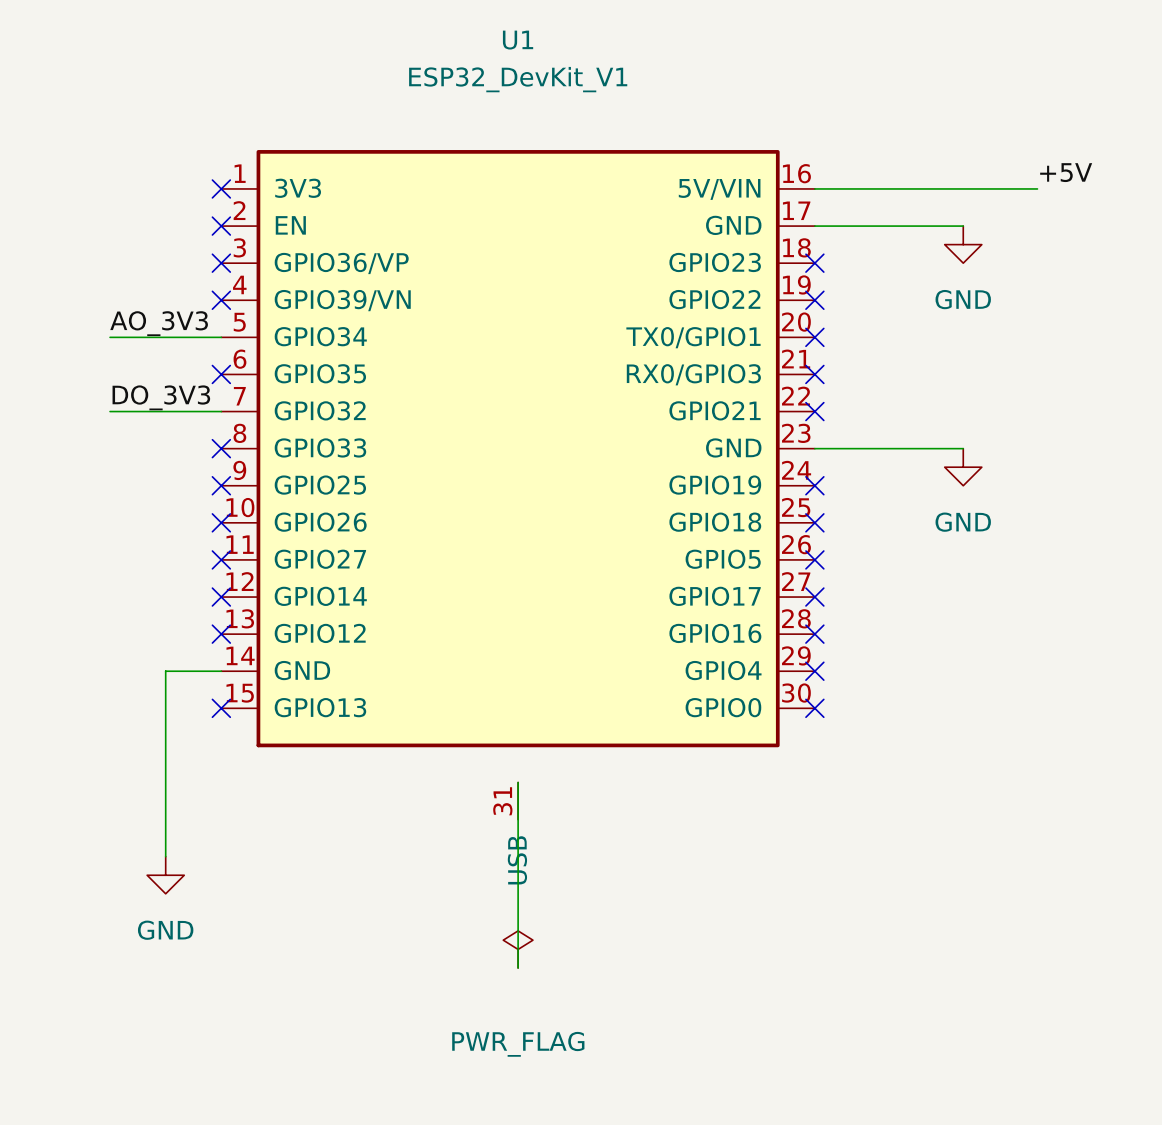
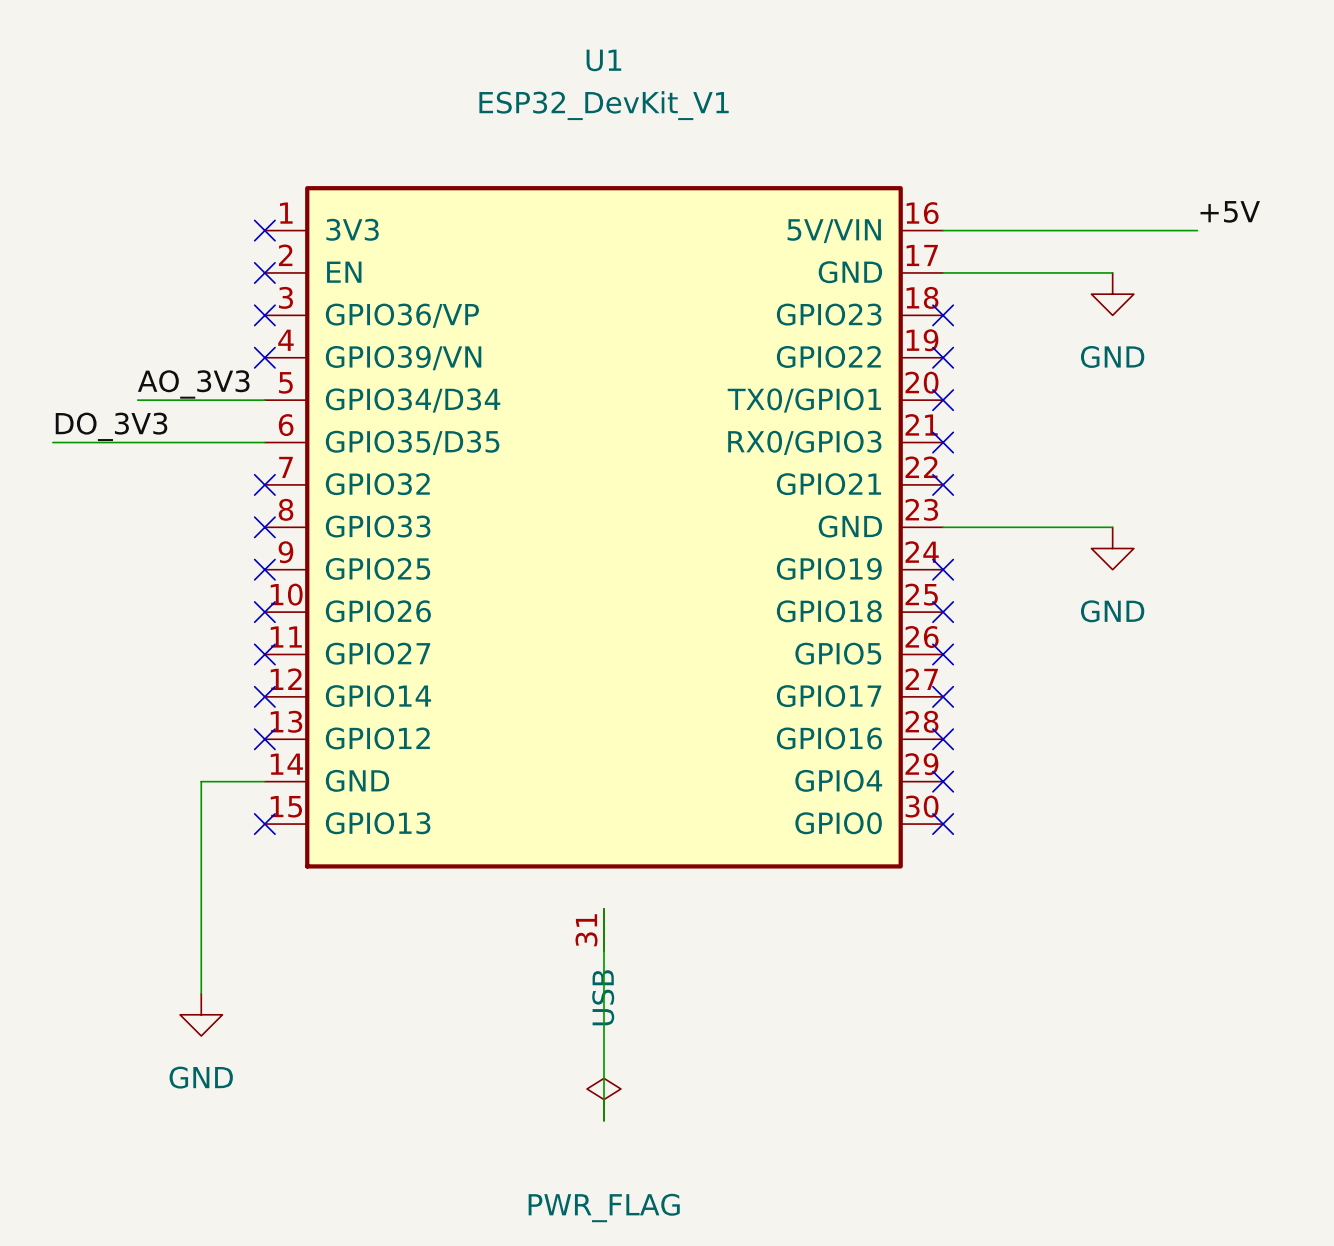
U1 pin name: GPIO34 (320, 336) -> GPIO34/D34 (413, 400)
U1 pin name: GPIO35 (320, 373) -> GPIO35/D35 (412, 442)
wire: none -> (52, 442) (264, 442)
no-connect mark position: (221, 374) -> (264, 484)
label position: DO_3V3 (161, 397) -> DO_3V3 (111, 426)
wire: (110, 411) (221, 411) -> none

